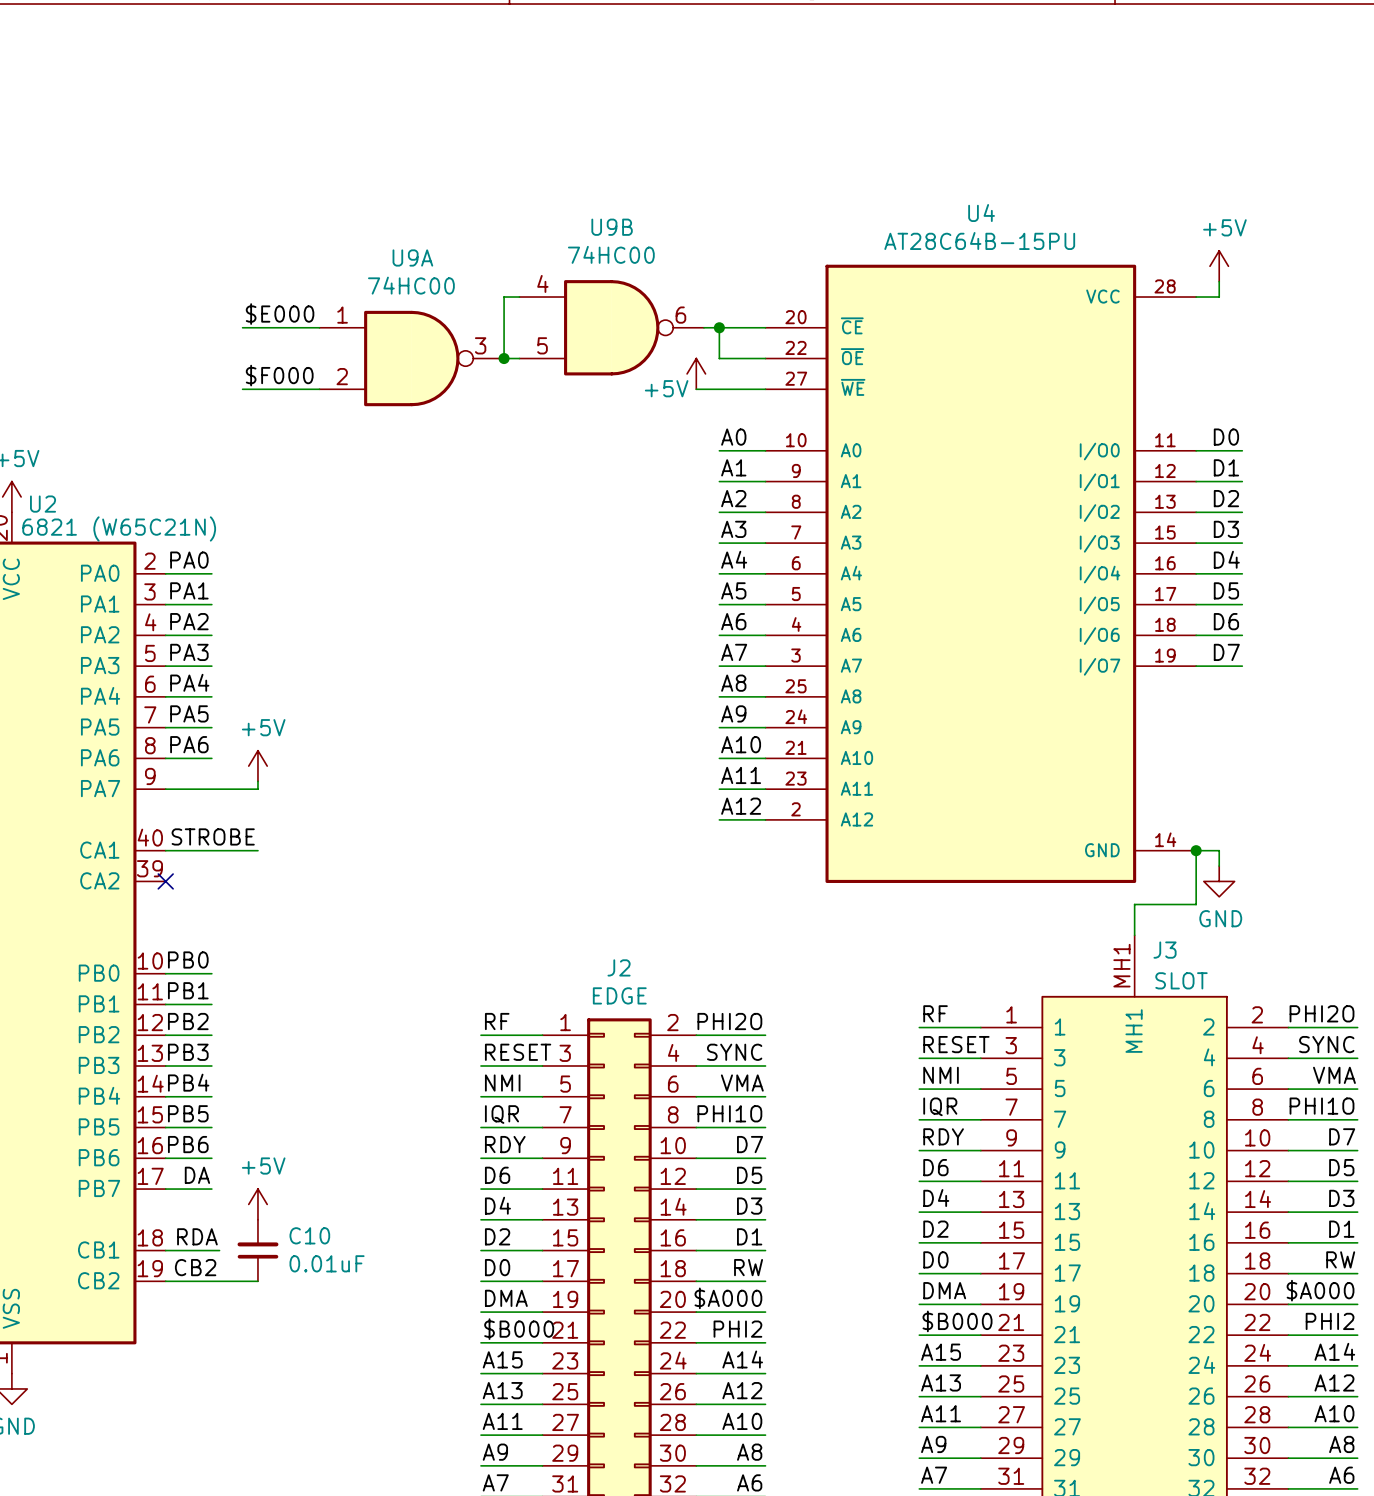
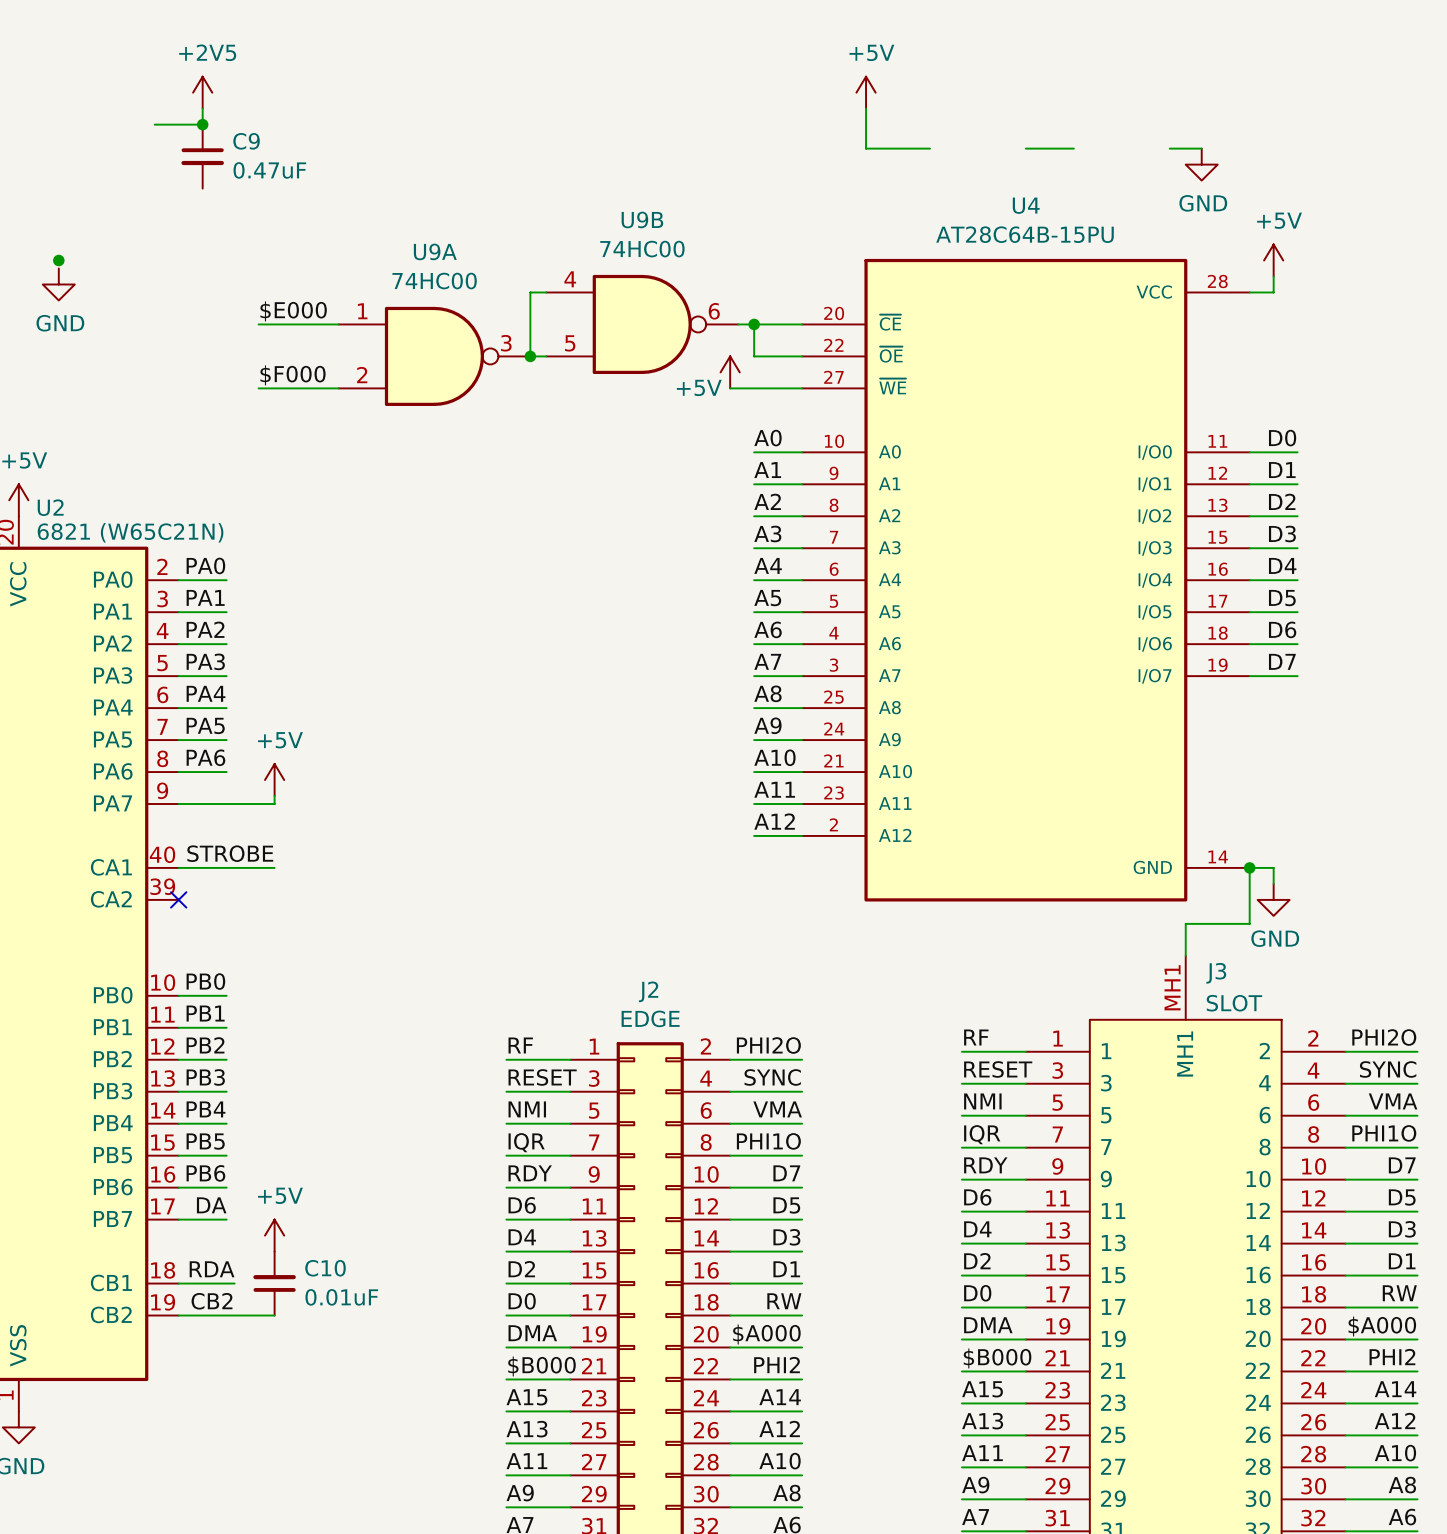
power symbol: none -> +2V5 (202, 92)
power symbol: none -> +5V (866, 92)
wire: none -> (202, 108) (202, 124) (154, 124)
wire: none -> (866, 108) (866, 148) (929, 148)
junction: none -> (202, 124)
wire: none -> (1025, 148) (1073, 148)
wire: none -> (1169, 148) (1201, 148)
C9: none -> 0.47uF (202, 156)
power symbol: none -> GND (1201, 164)
junction: none -> (58, 260)
power symbol: none -> GND (58, 284)

